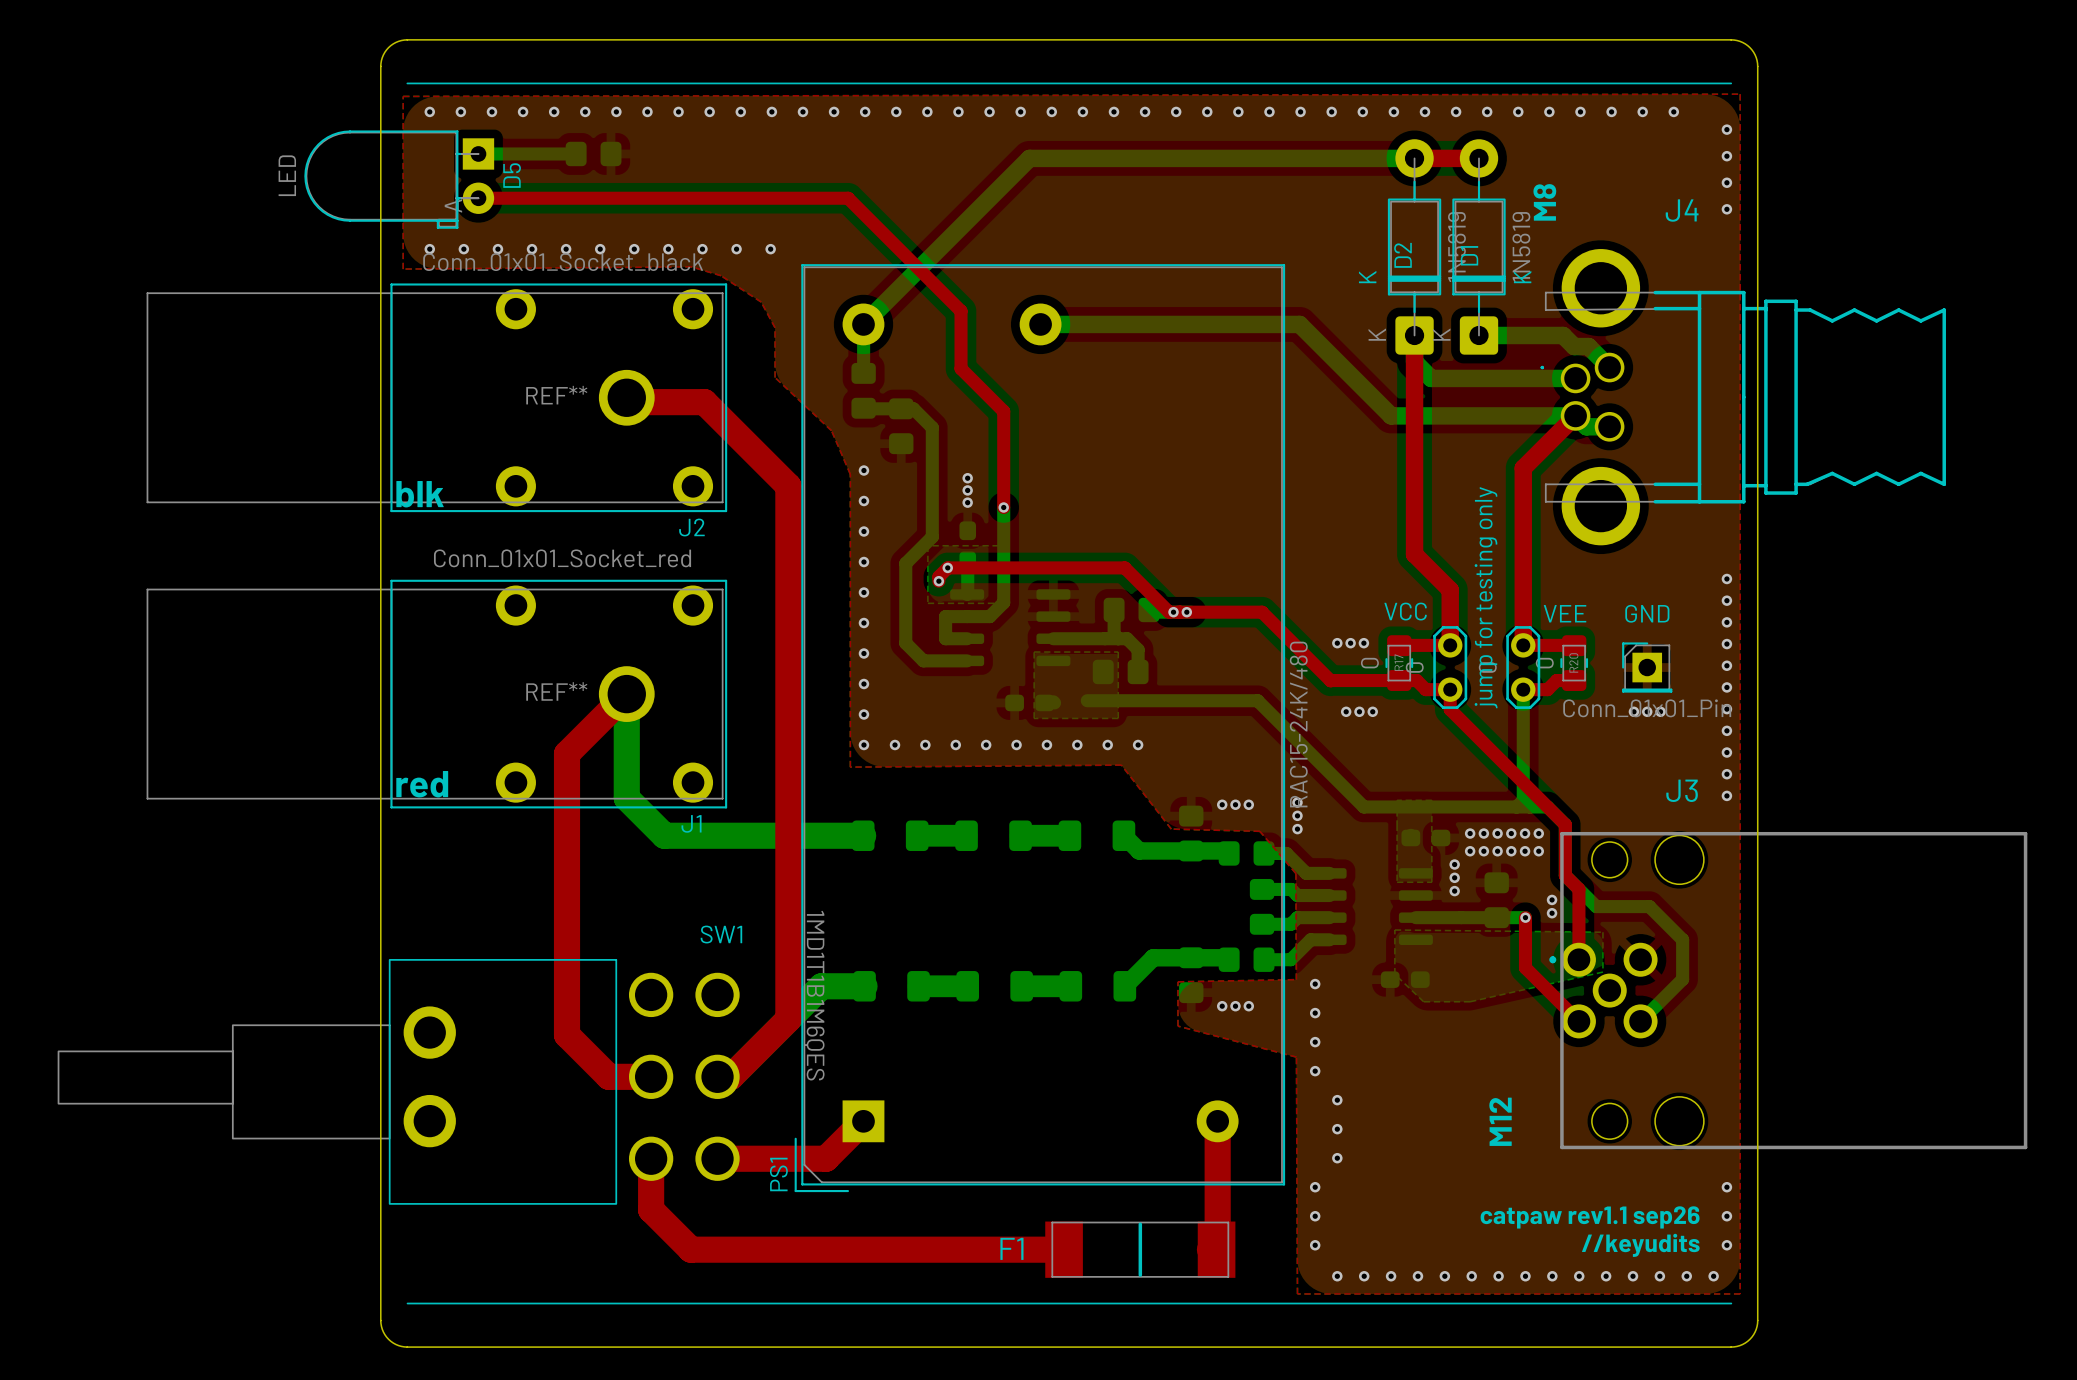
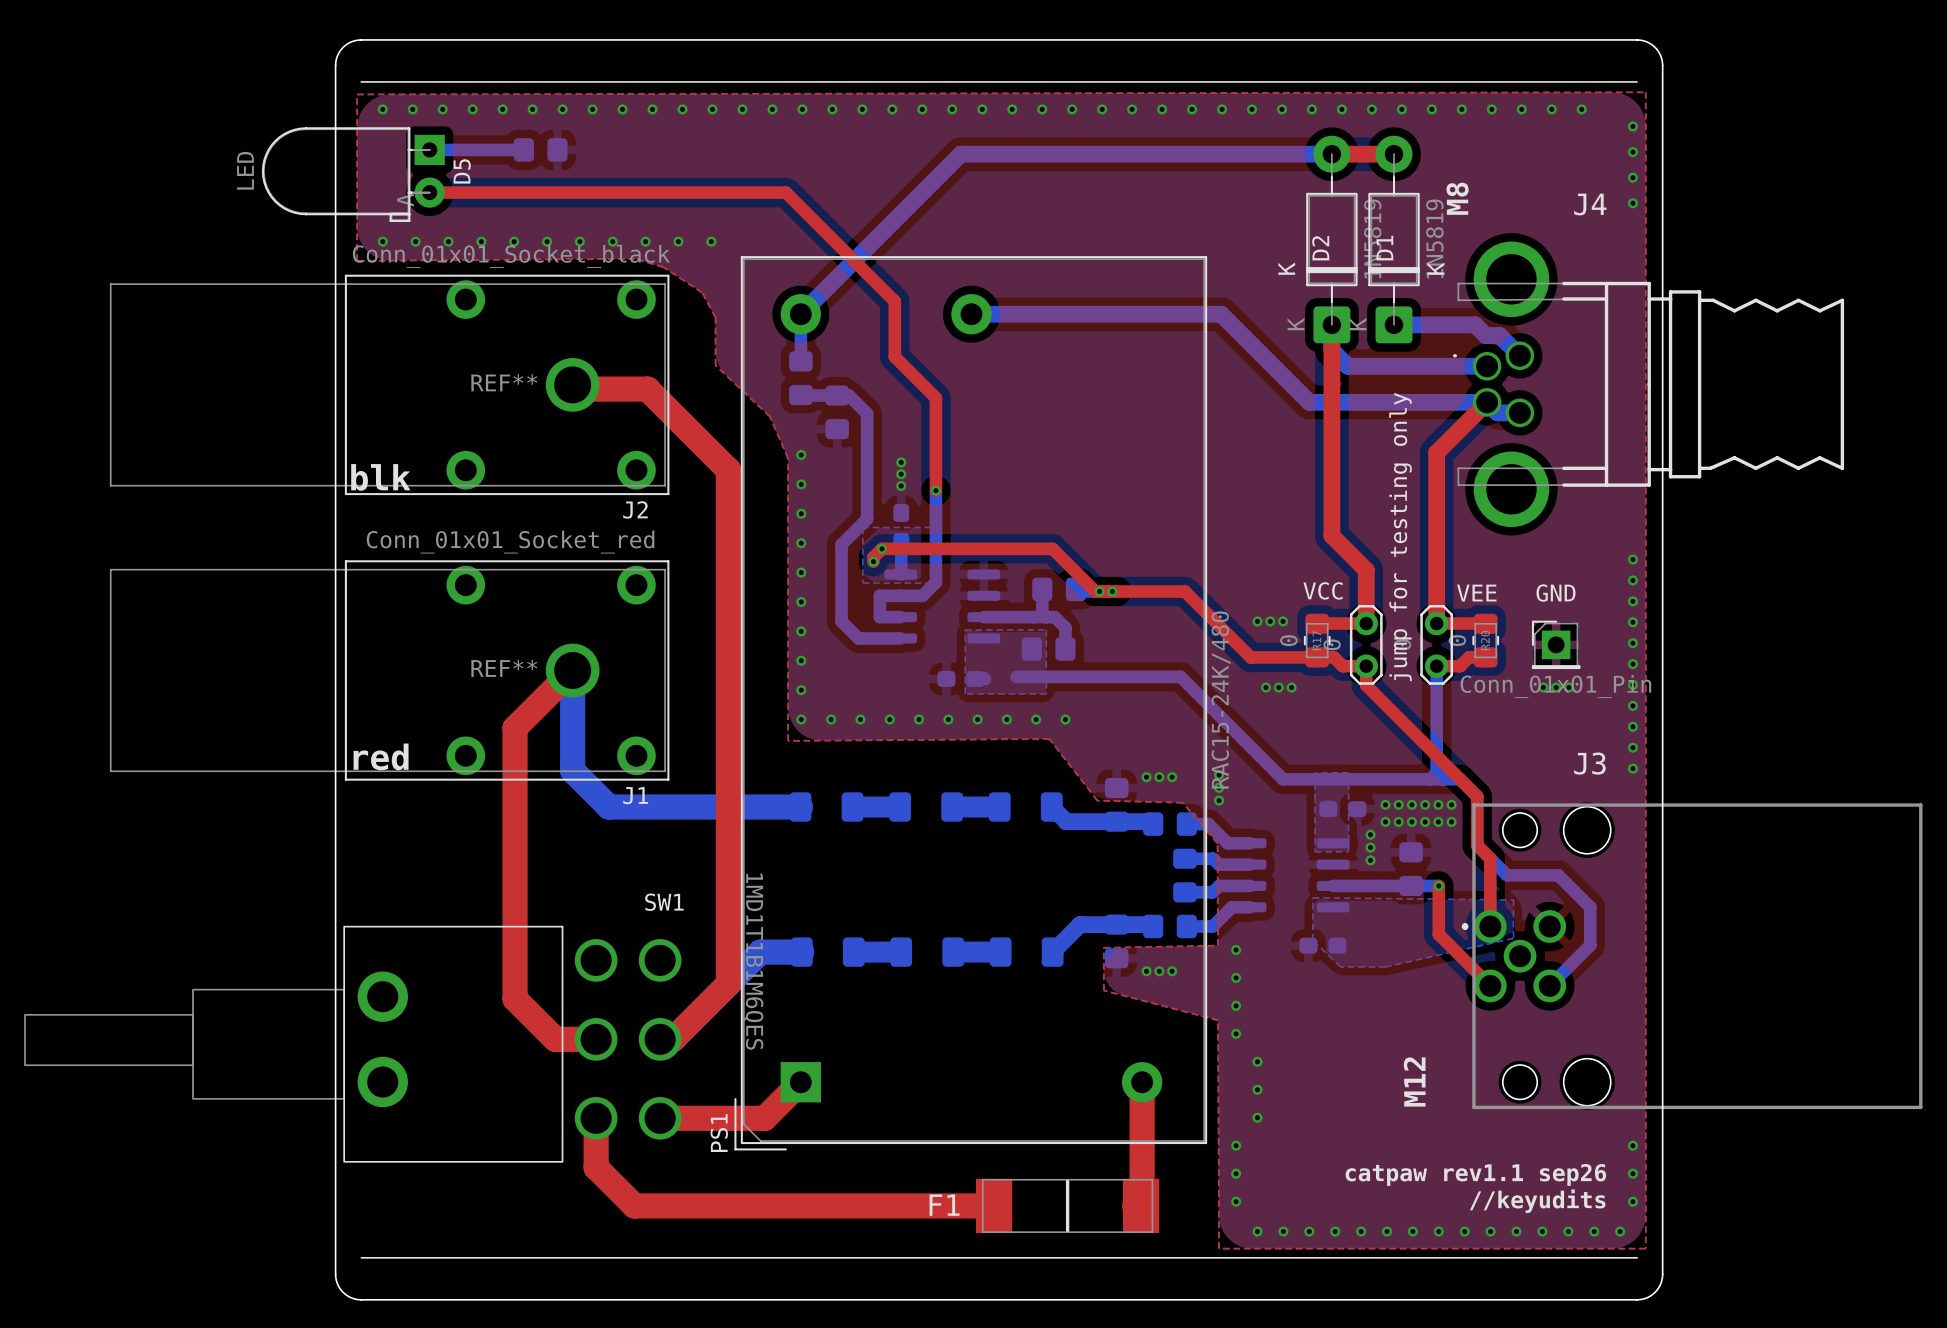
via: (1552, 899) -> none
via: (1552, 913) -> none

